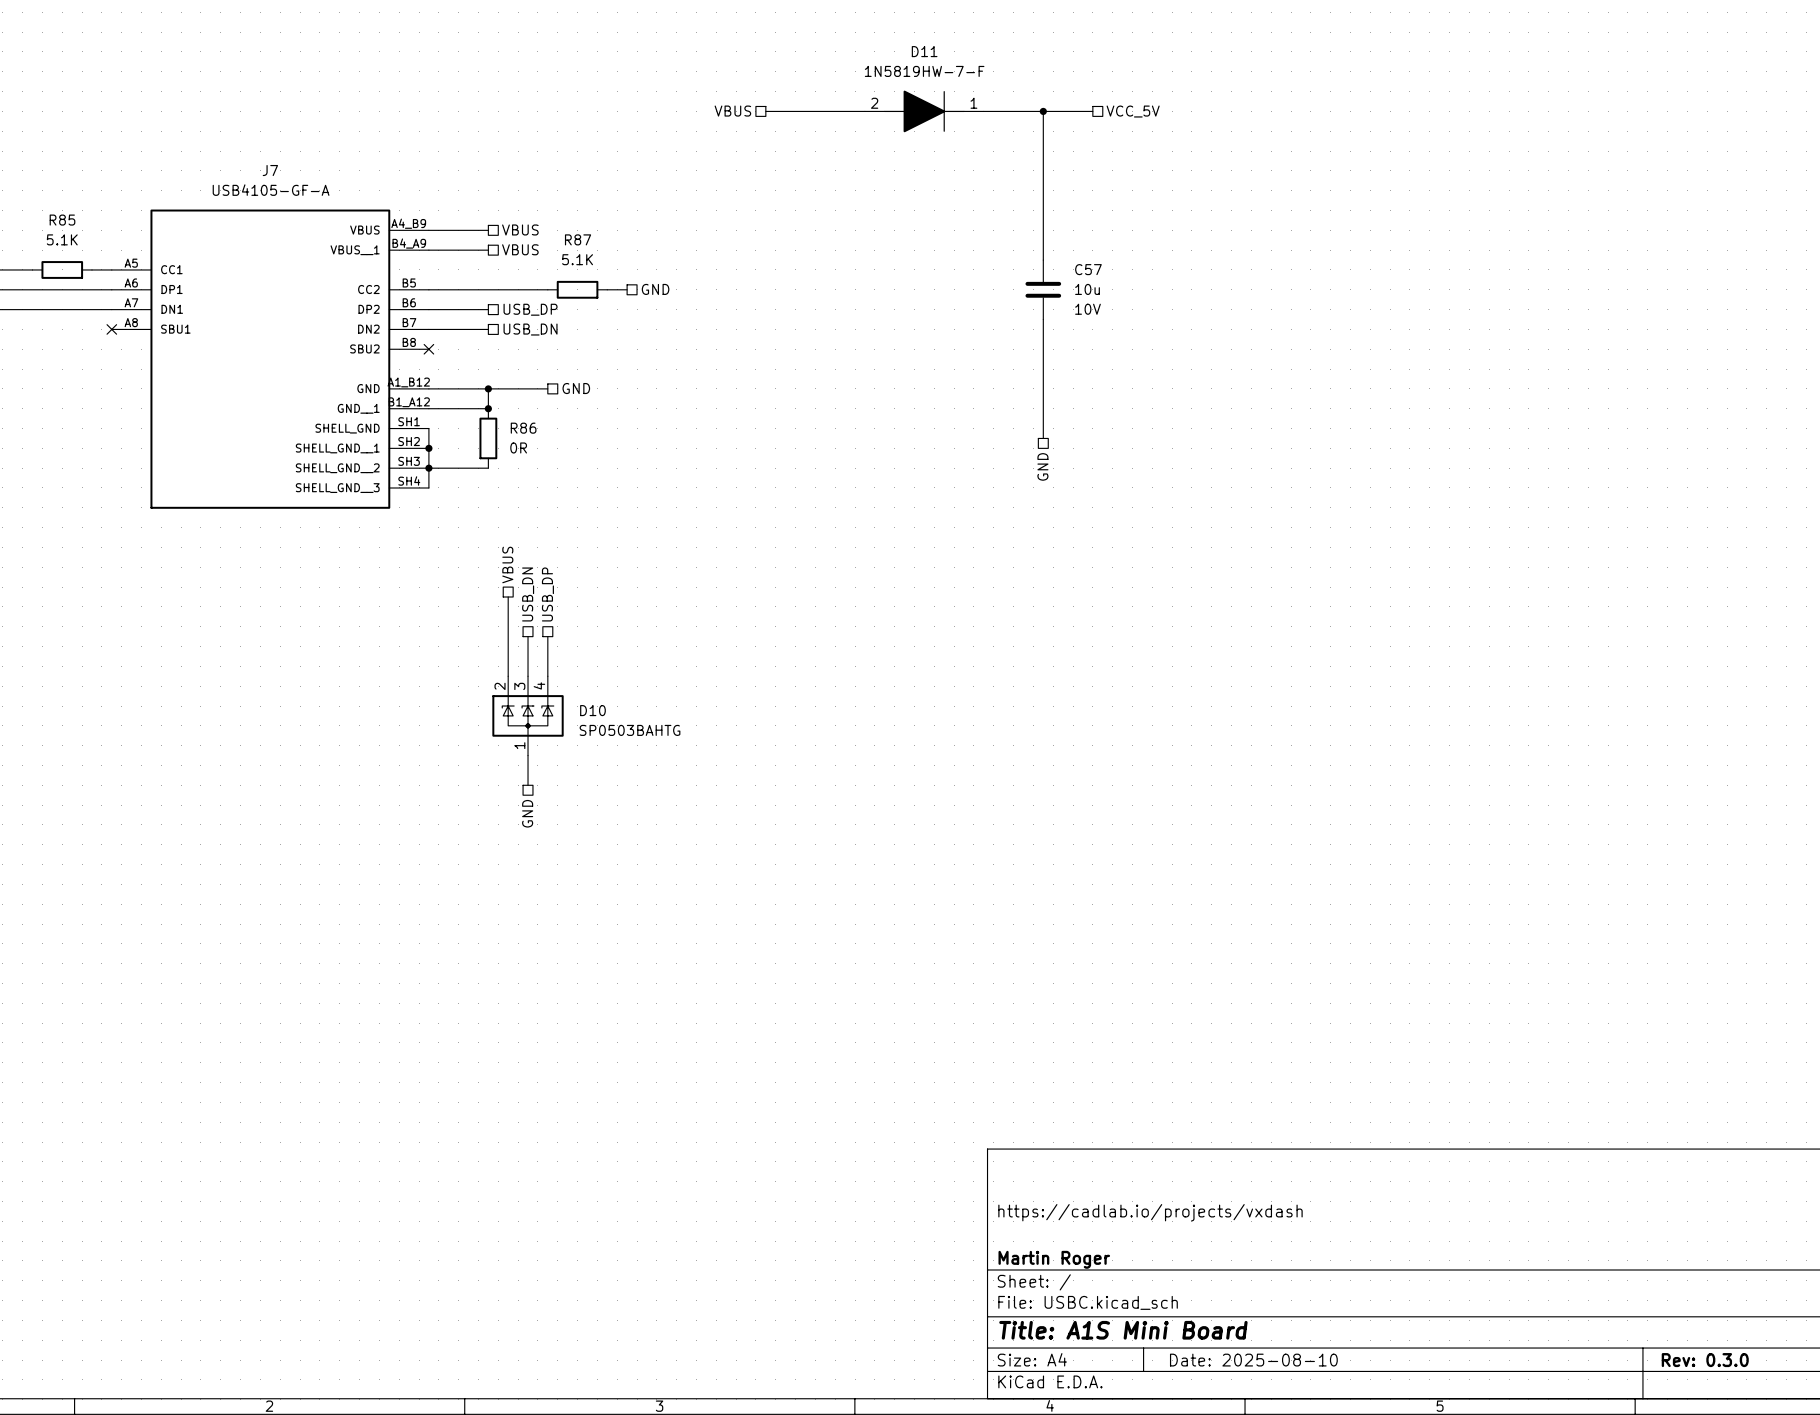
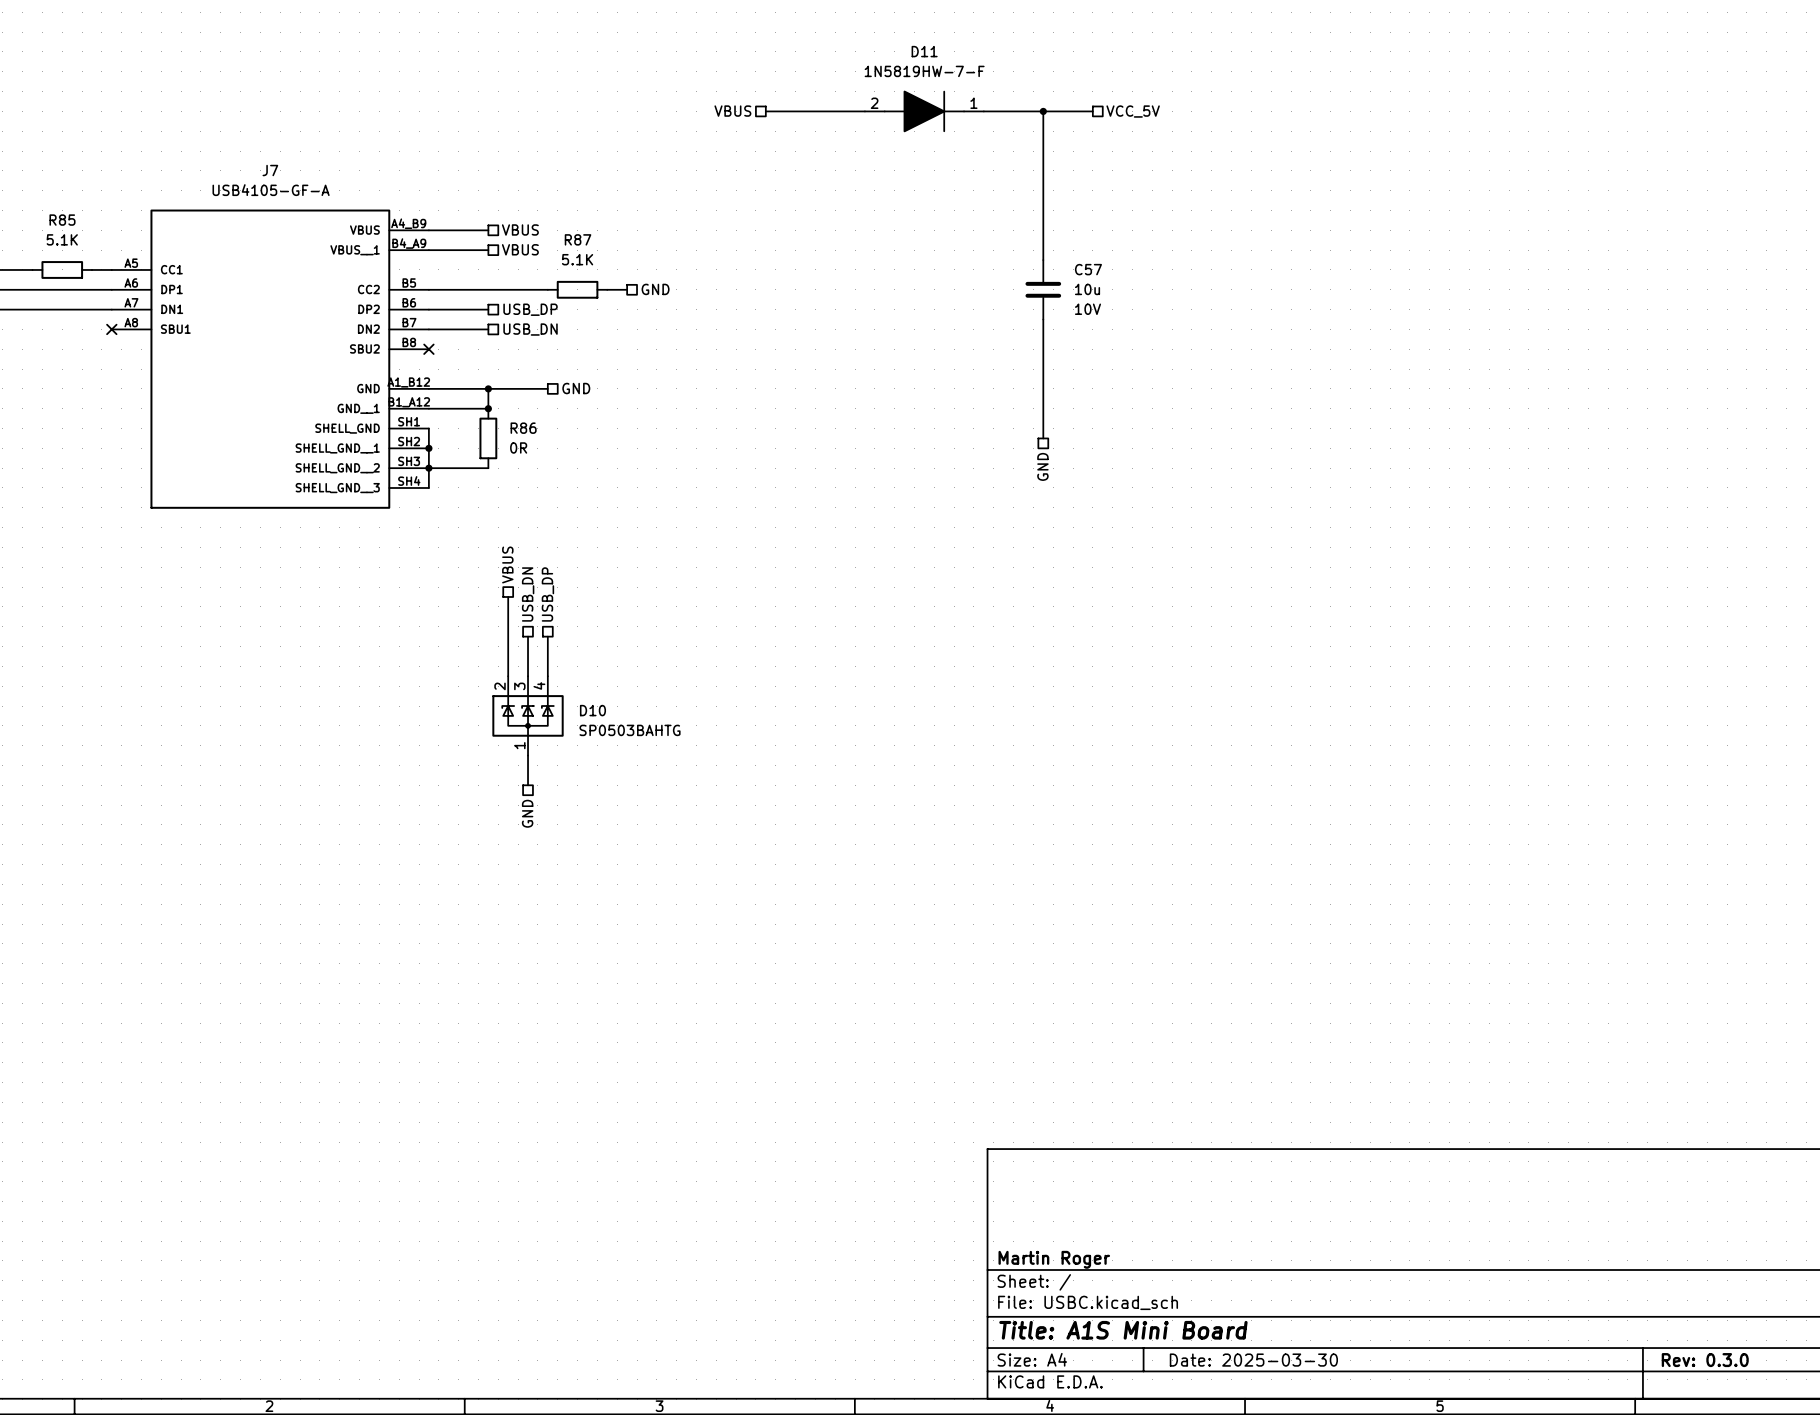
title block: https://cadlab.io/projects/vxdash (1150, 1212) -> none
title block: Date: 2025-08-10 (1253, 1360) -> Date: 2025-03-30 (1253, 1360)

